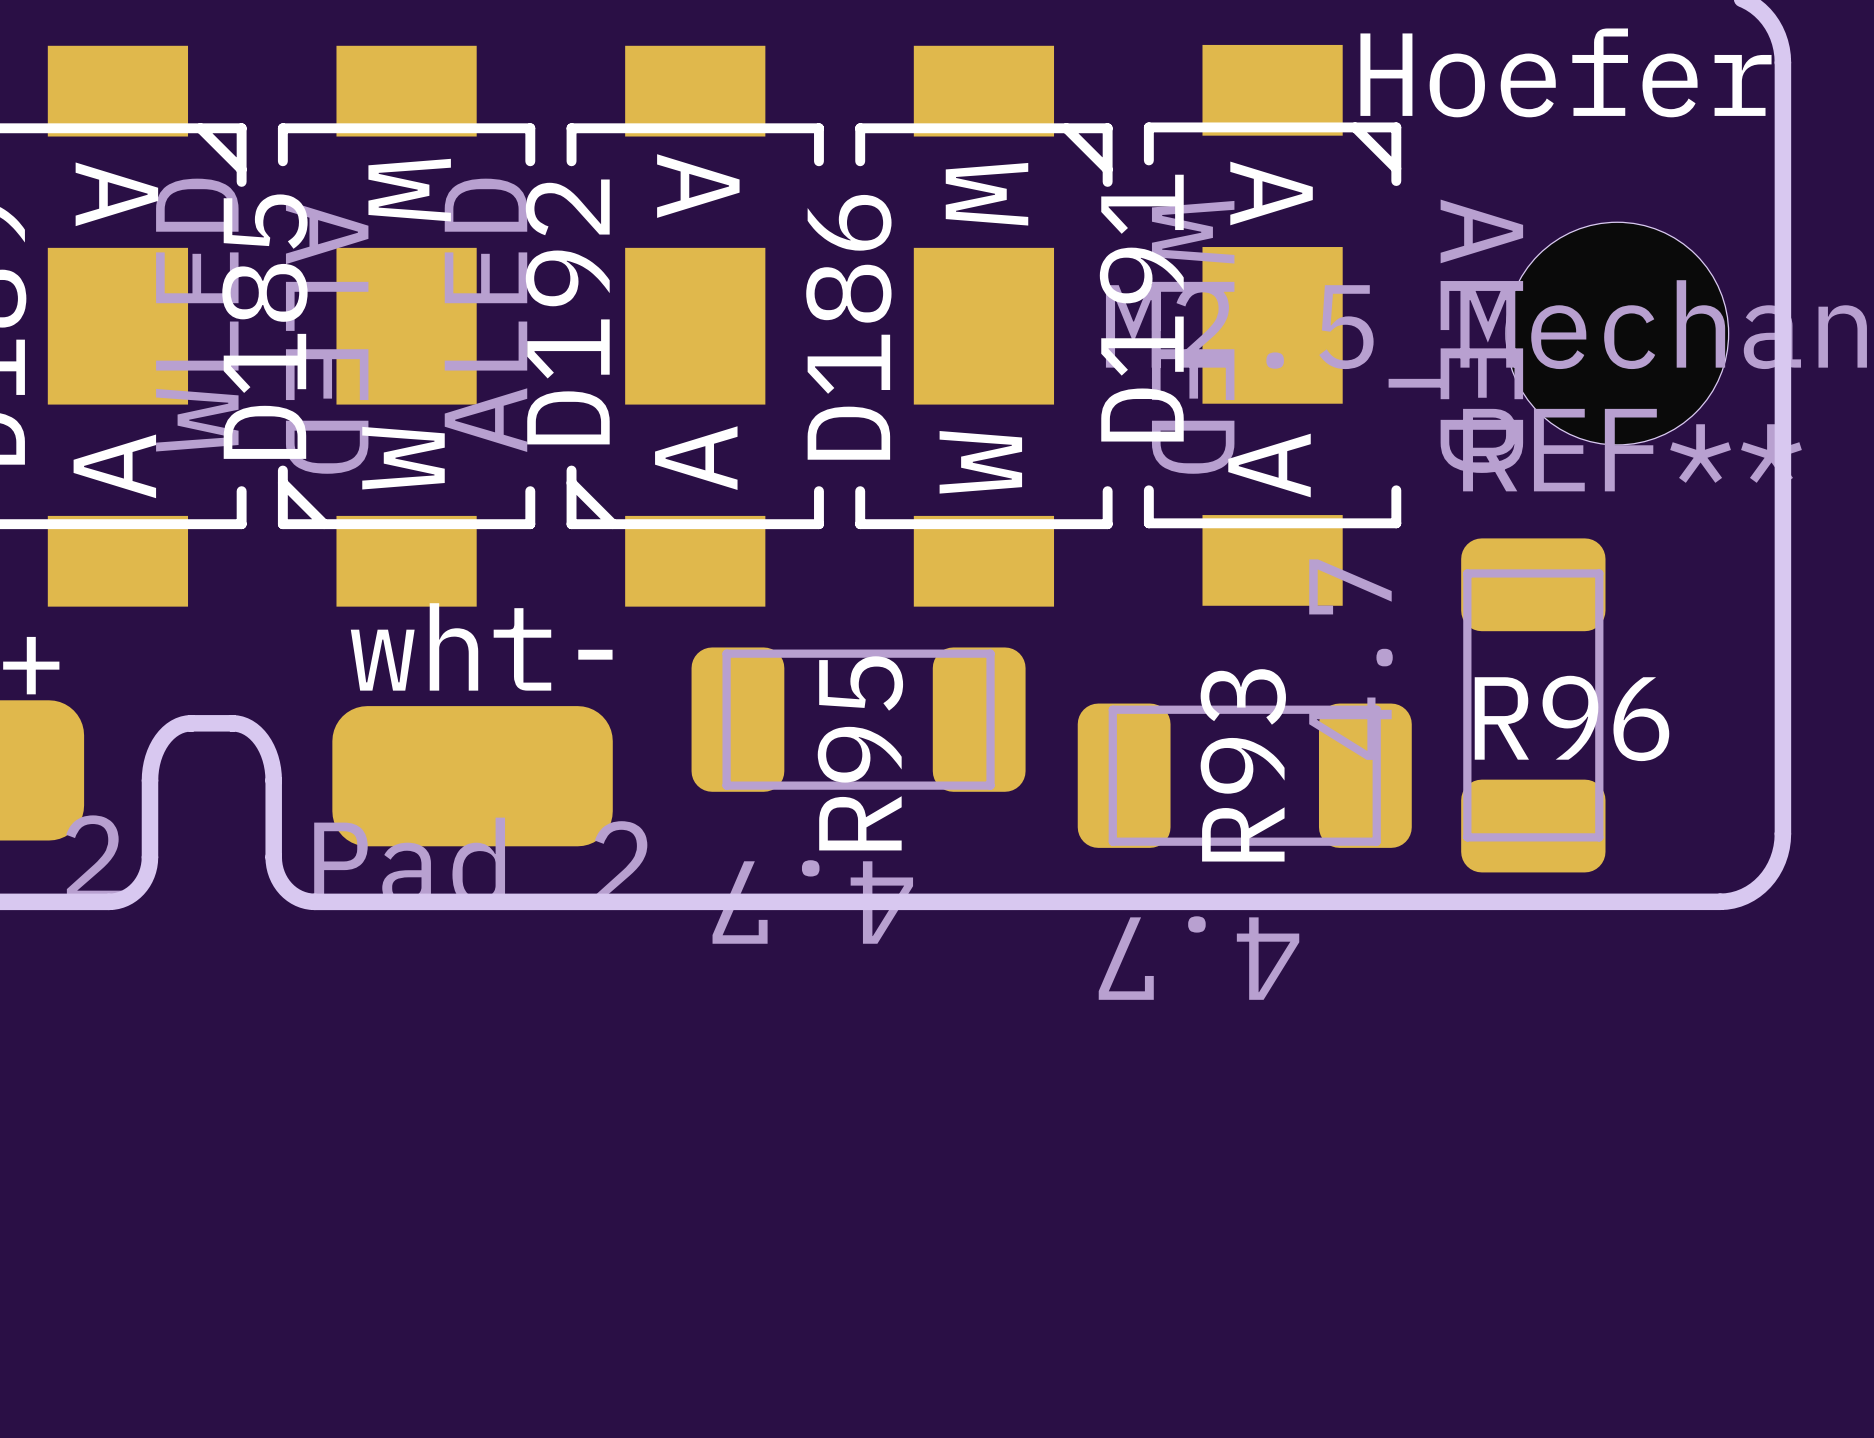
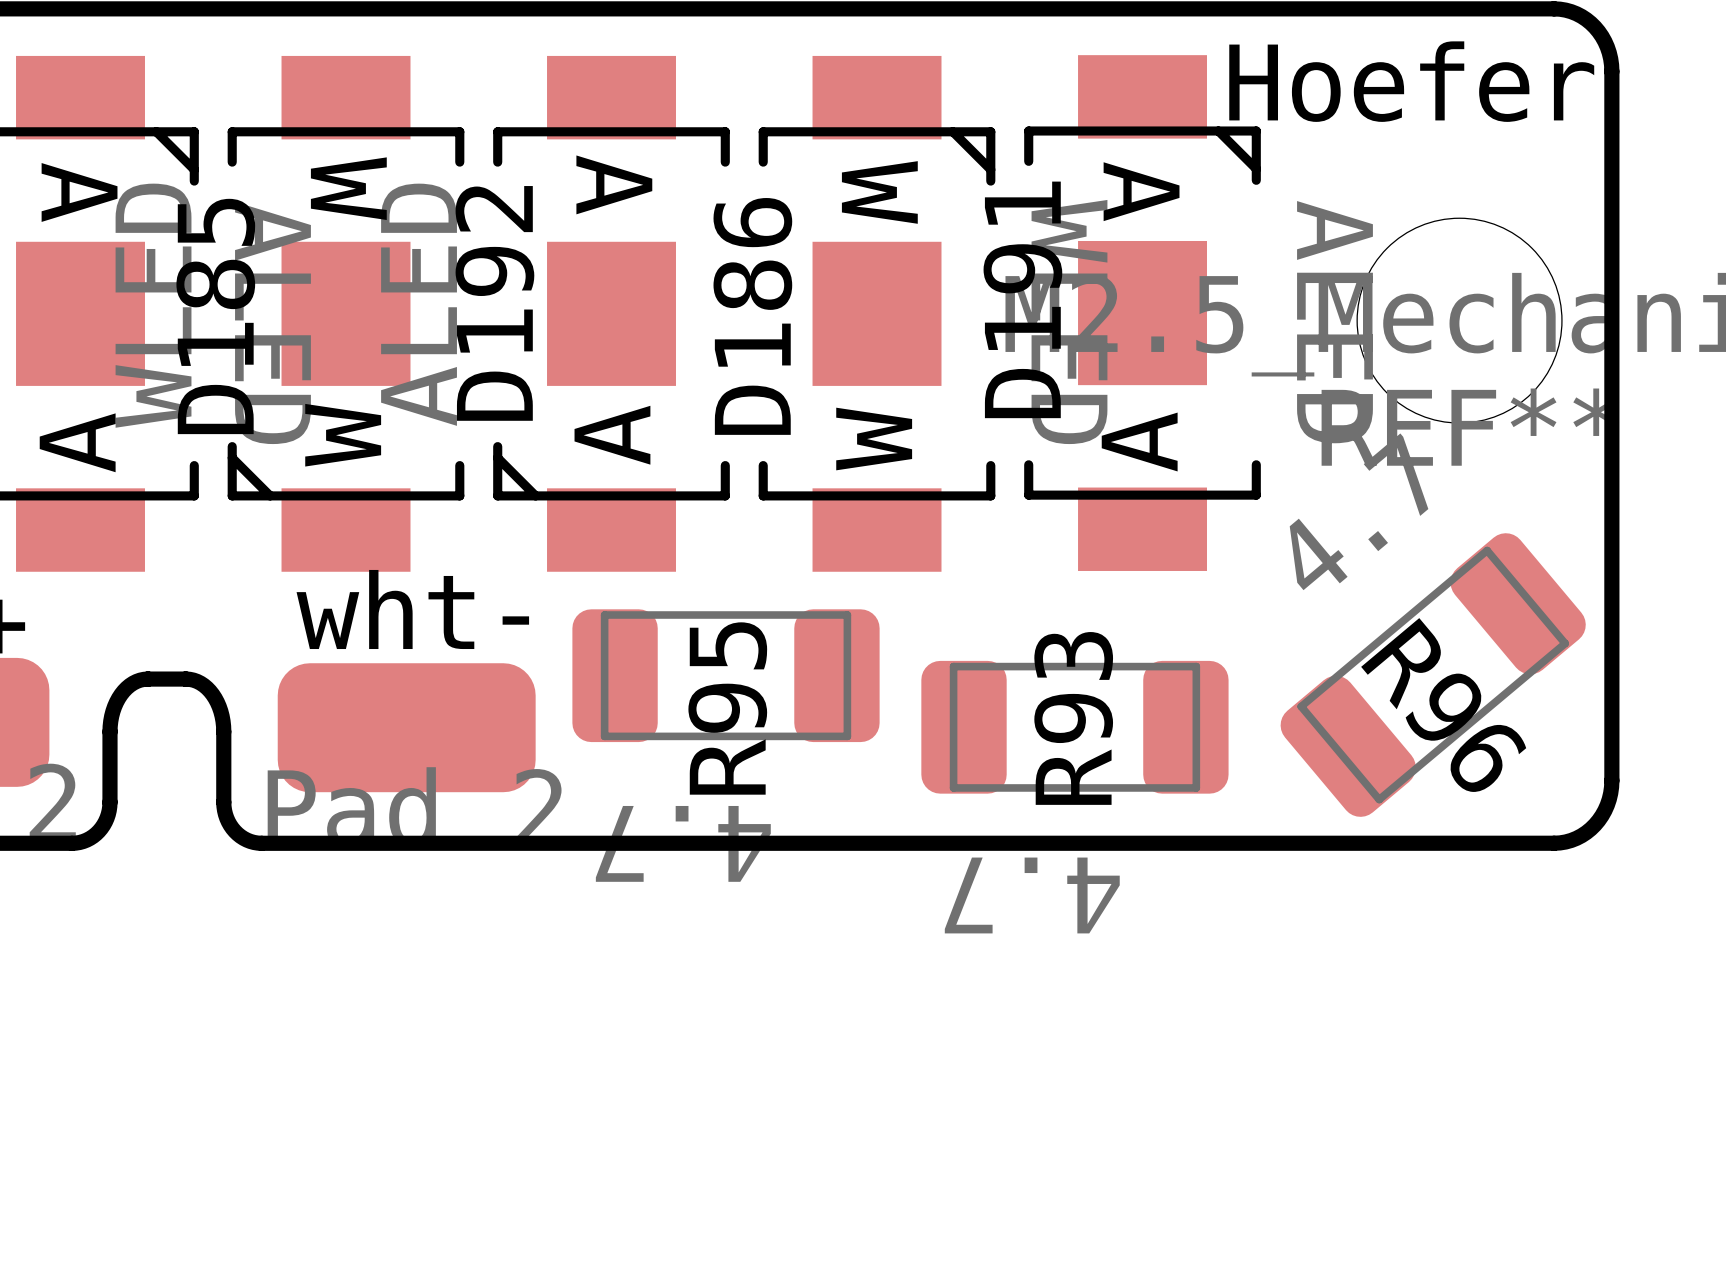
R96 rotation: 0° (1533, 705) -> 50° clockwise (1433, 675)
R95 position: (858, 719) -> (726, 675)
R93 position: (1244, 775) -> (1074, 727)

